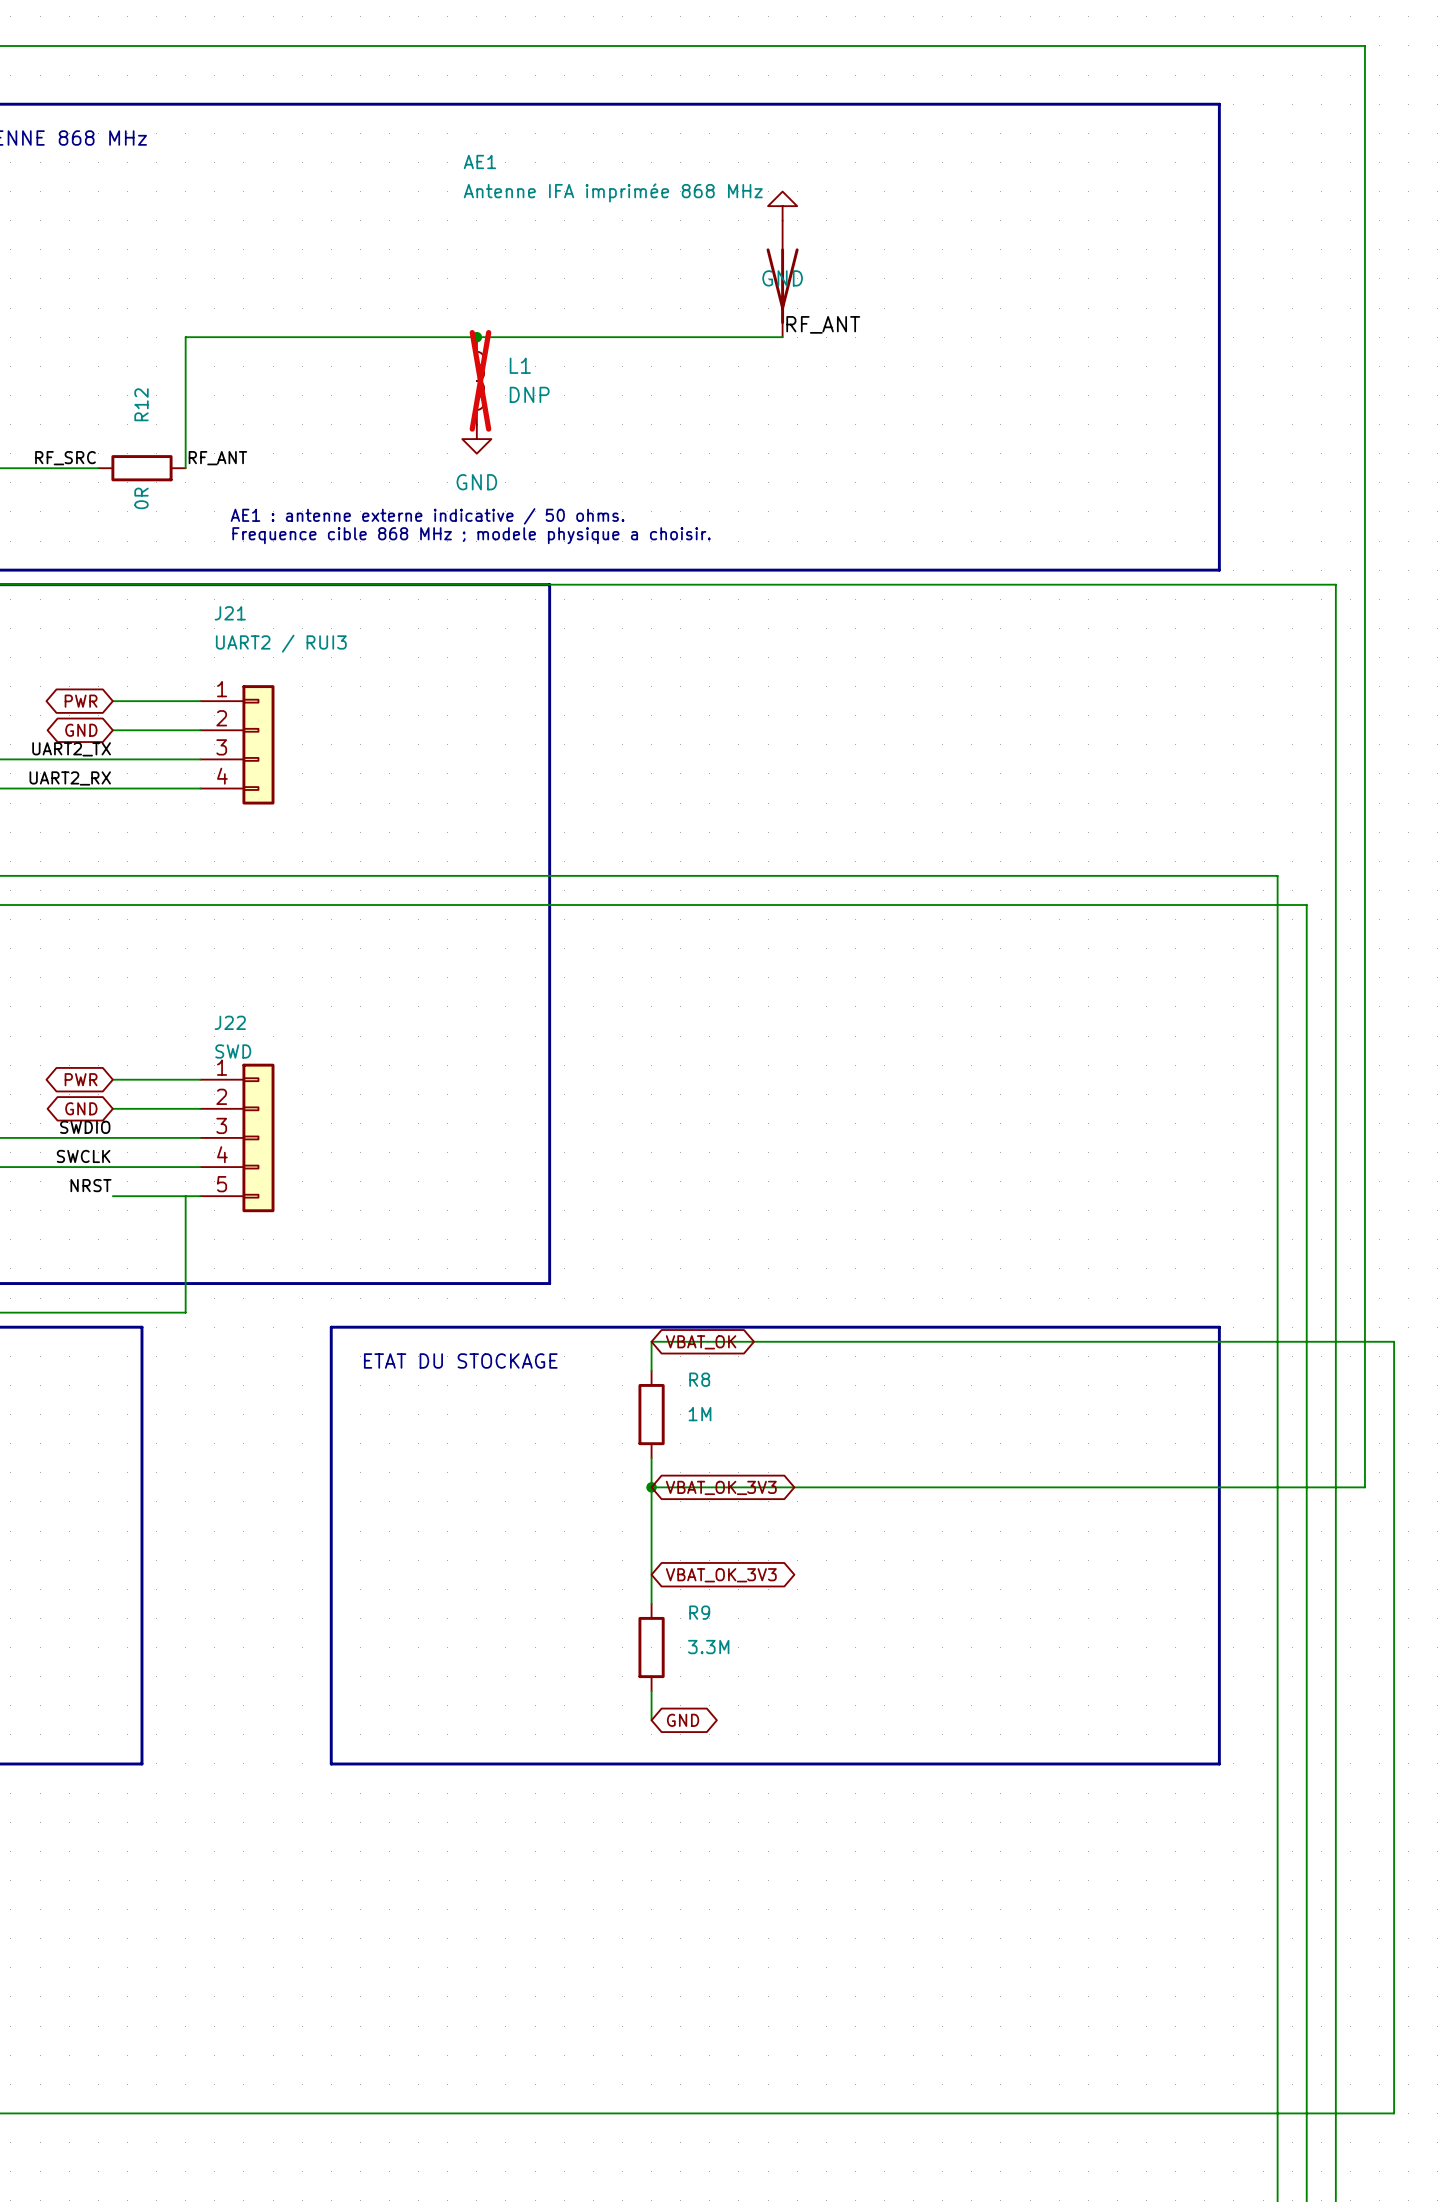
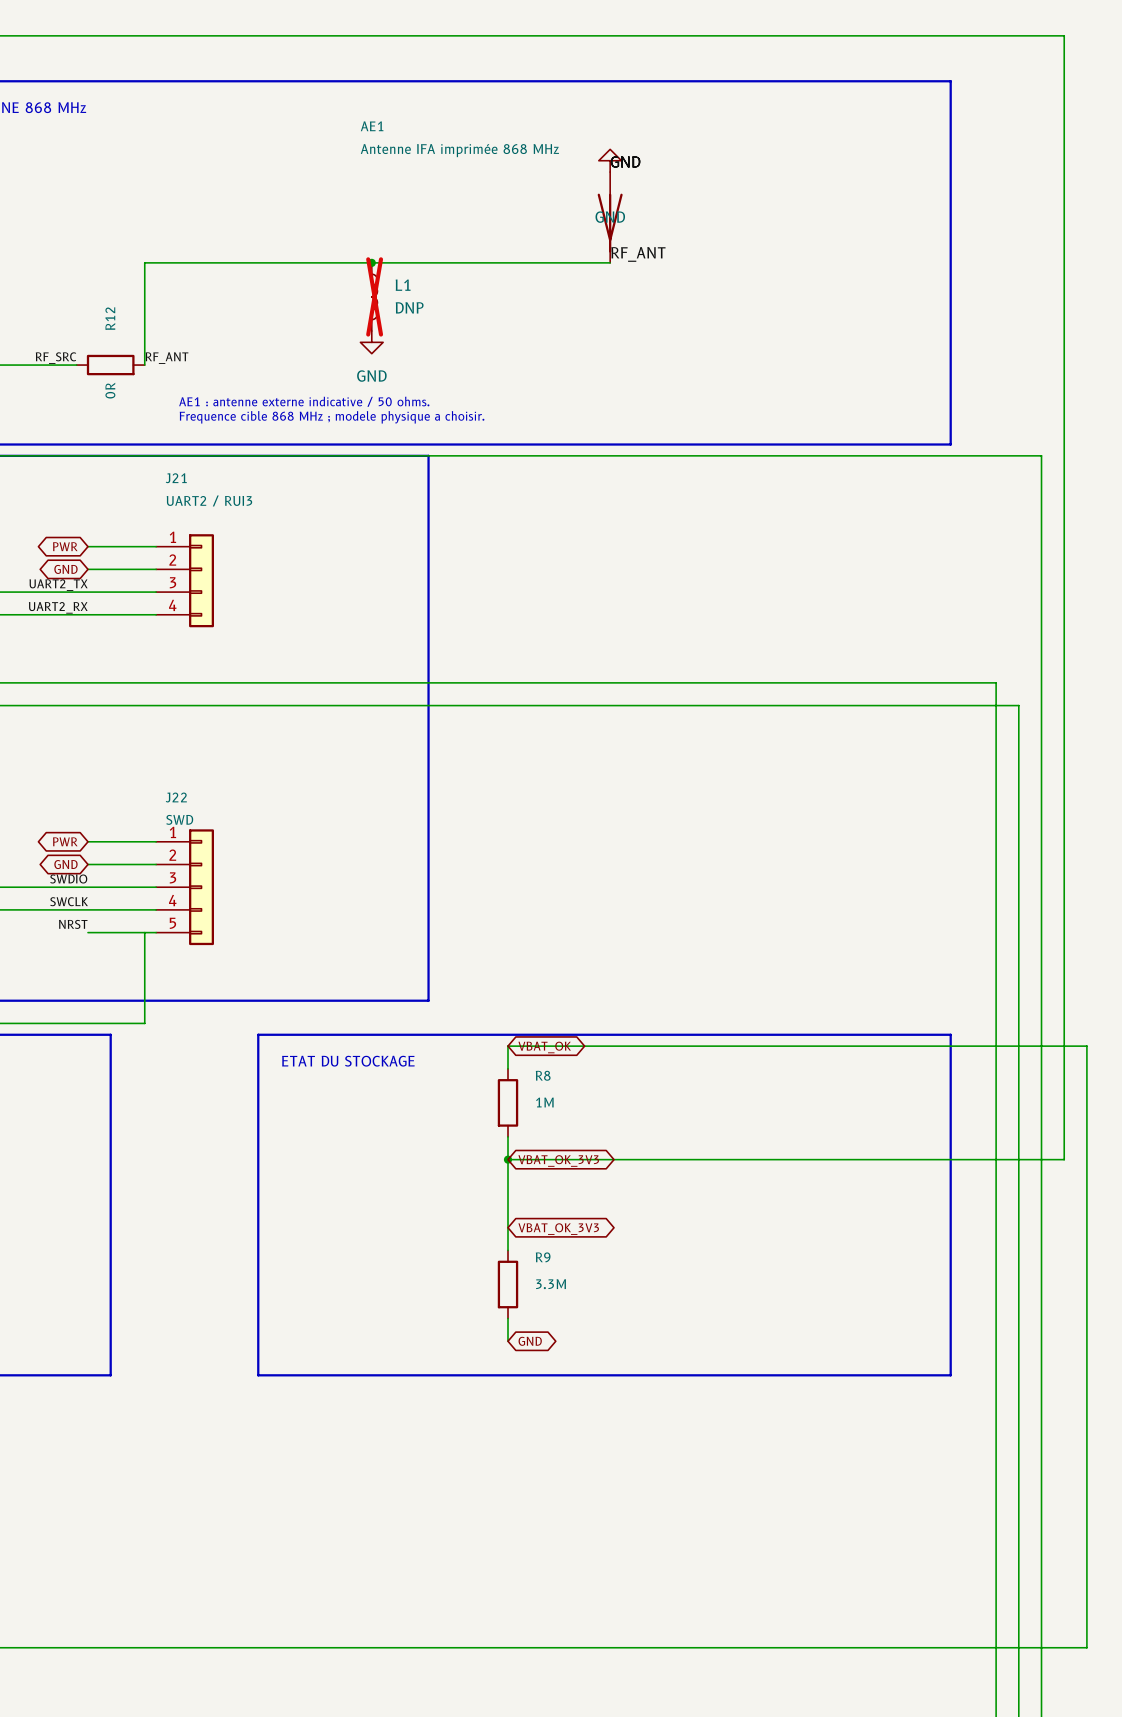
label: none -> GND (625, 162)

